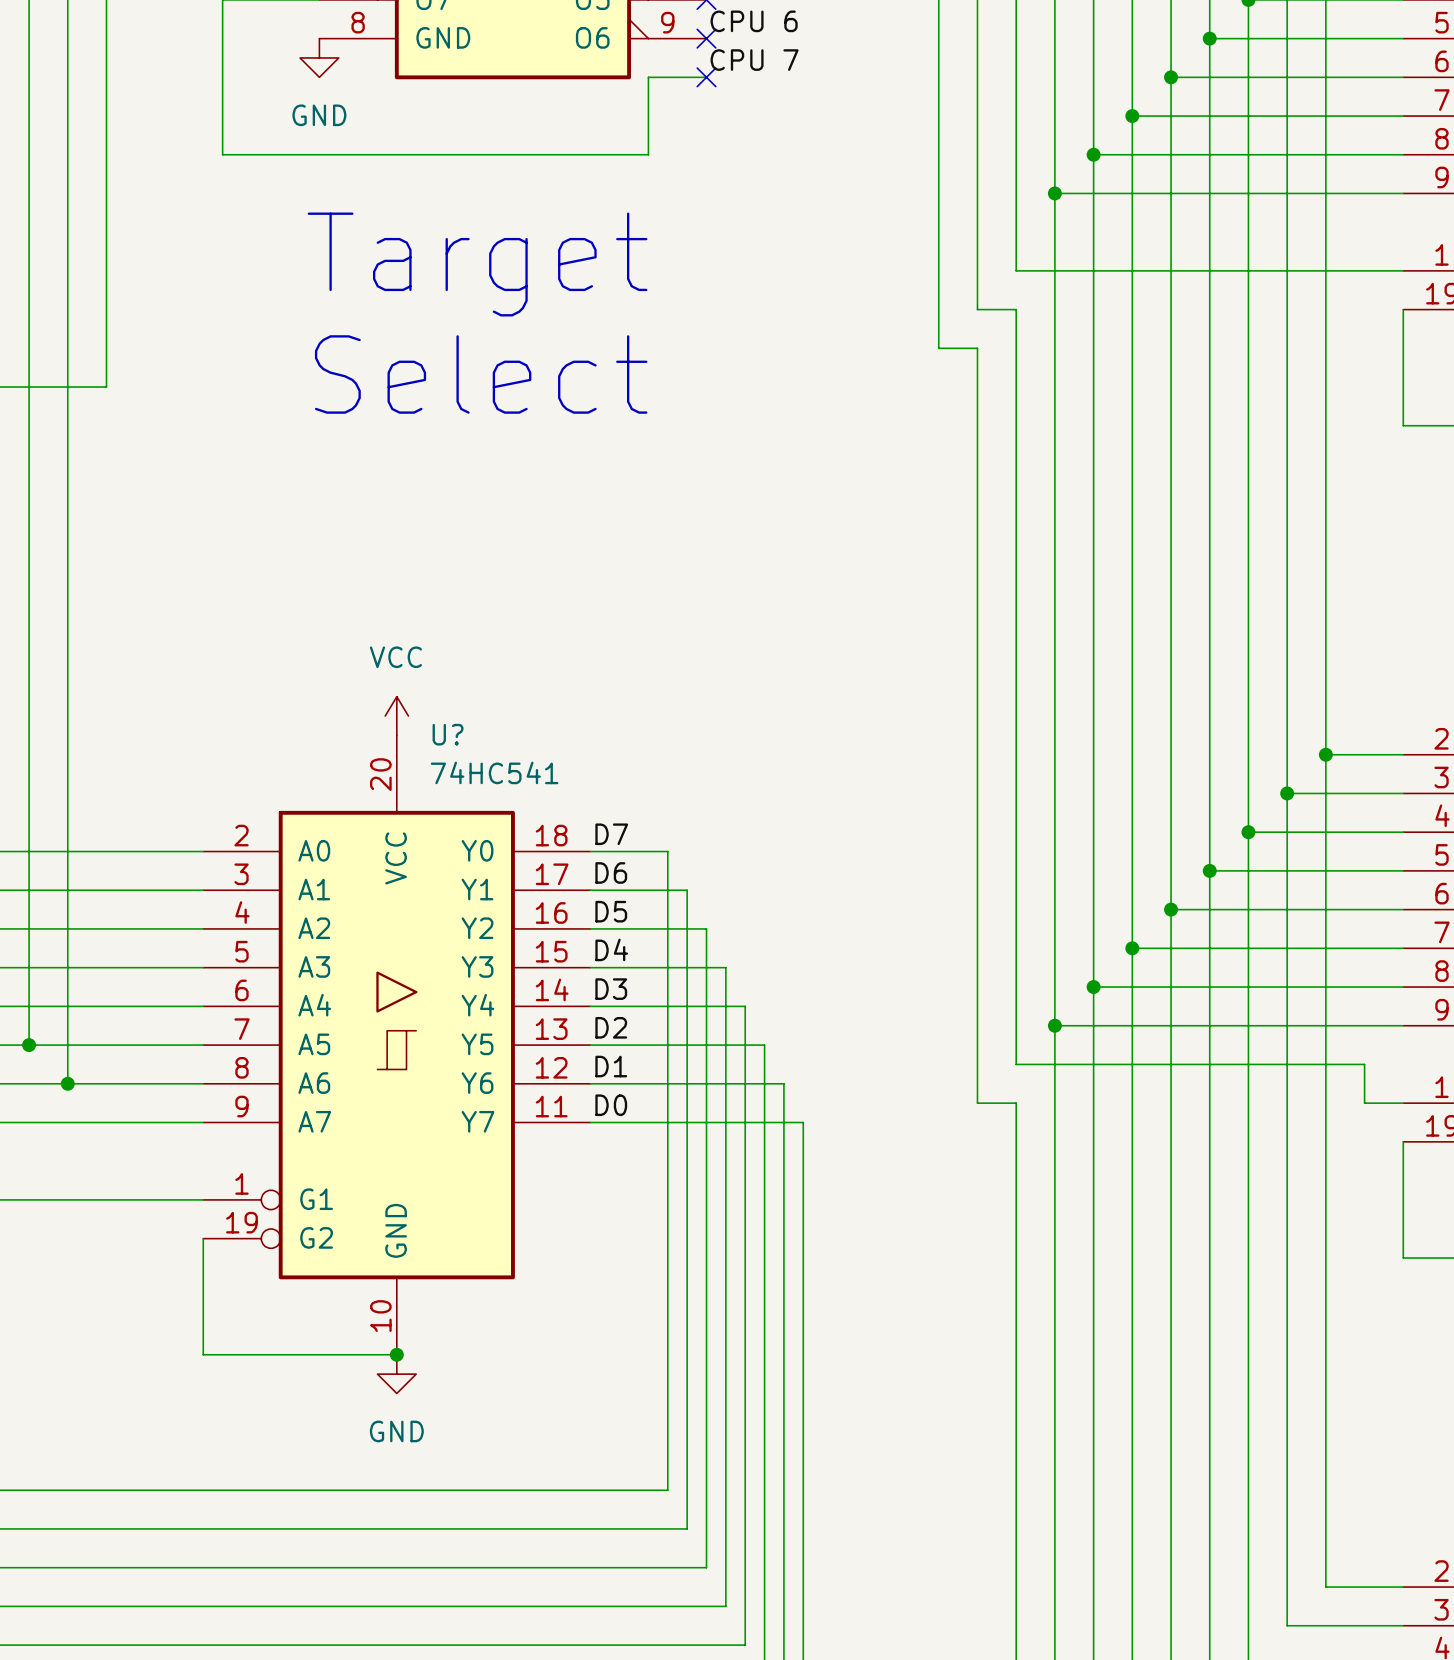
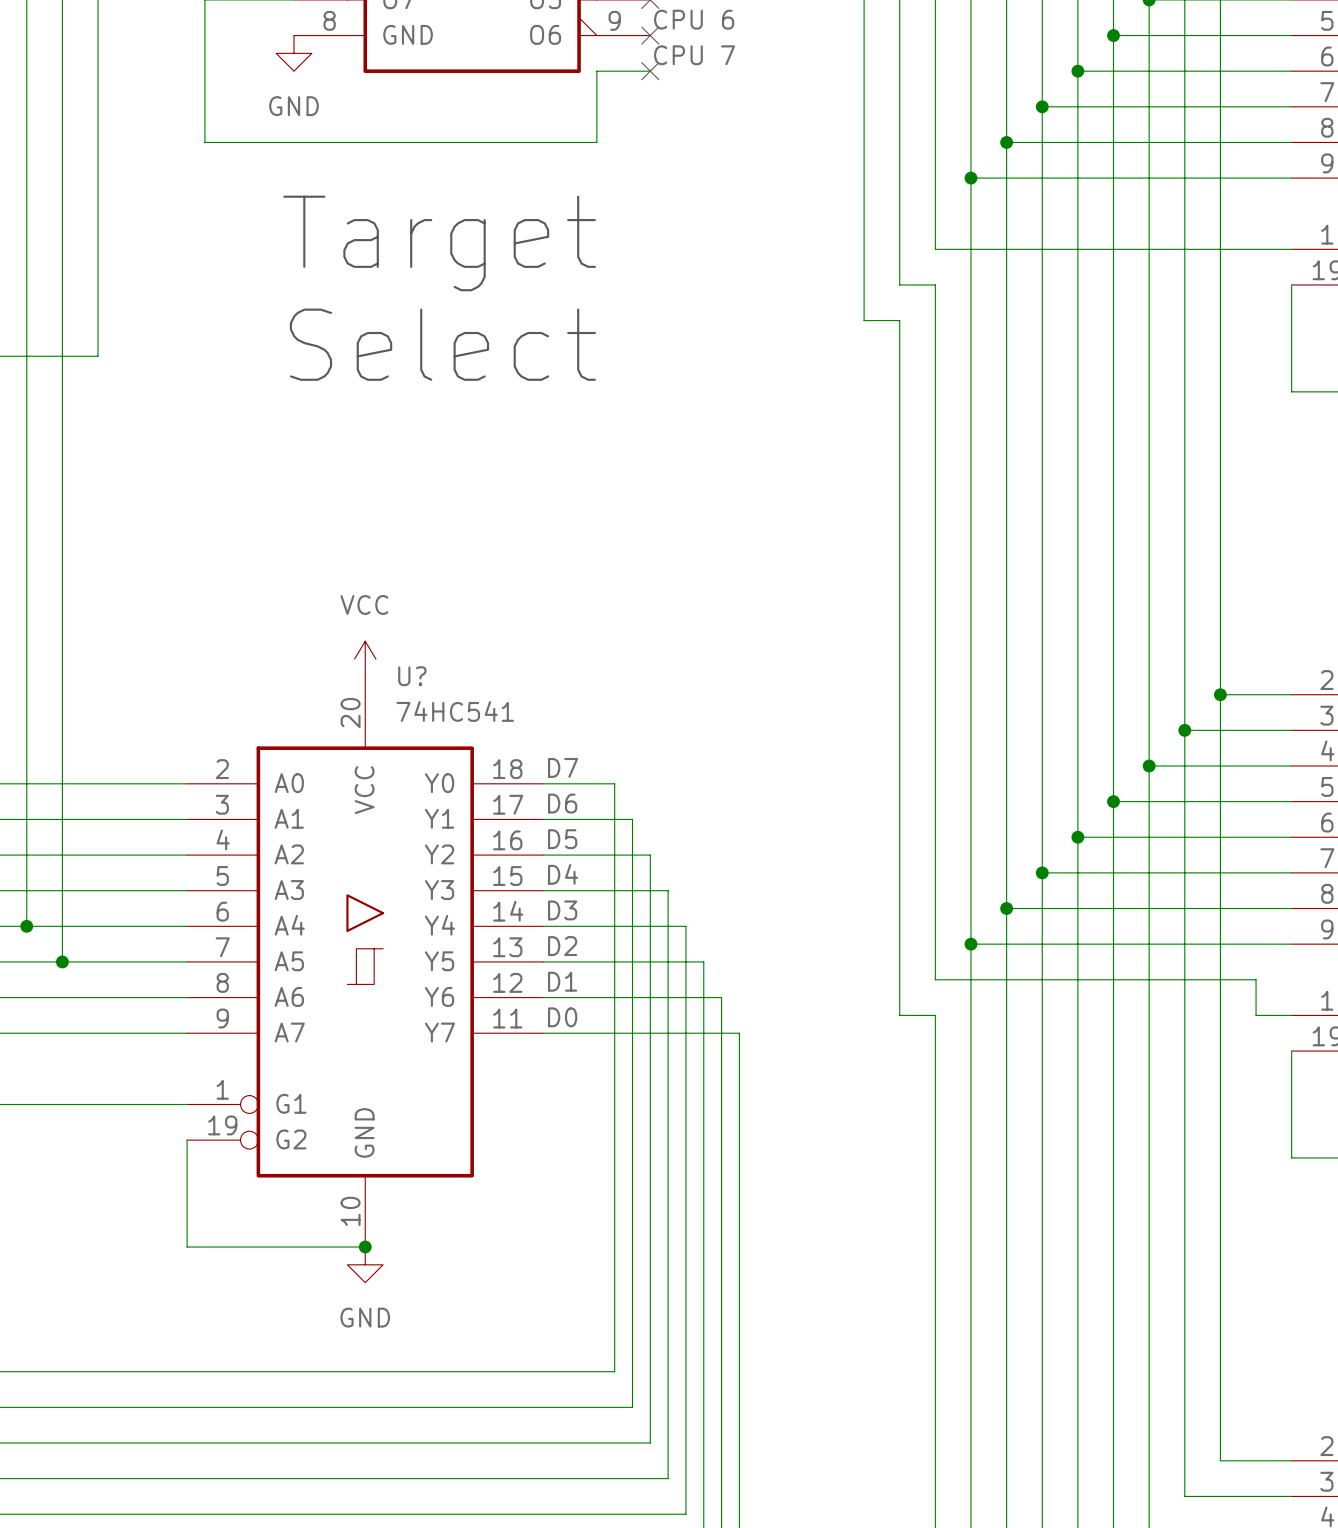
wire: (29, 1006) (29, 1045) -> none
junction: none -> (26, 926)
junction: (29, 1045) -> none
wire: (67, 1045) (67, 1083) -> none
junction: none -> (62, 961)
junction: (67, 1083) -> none

